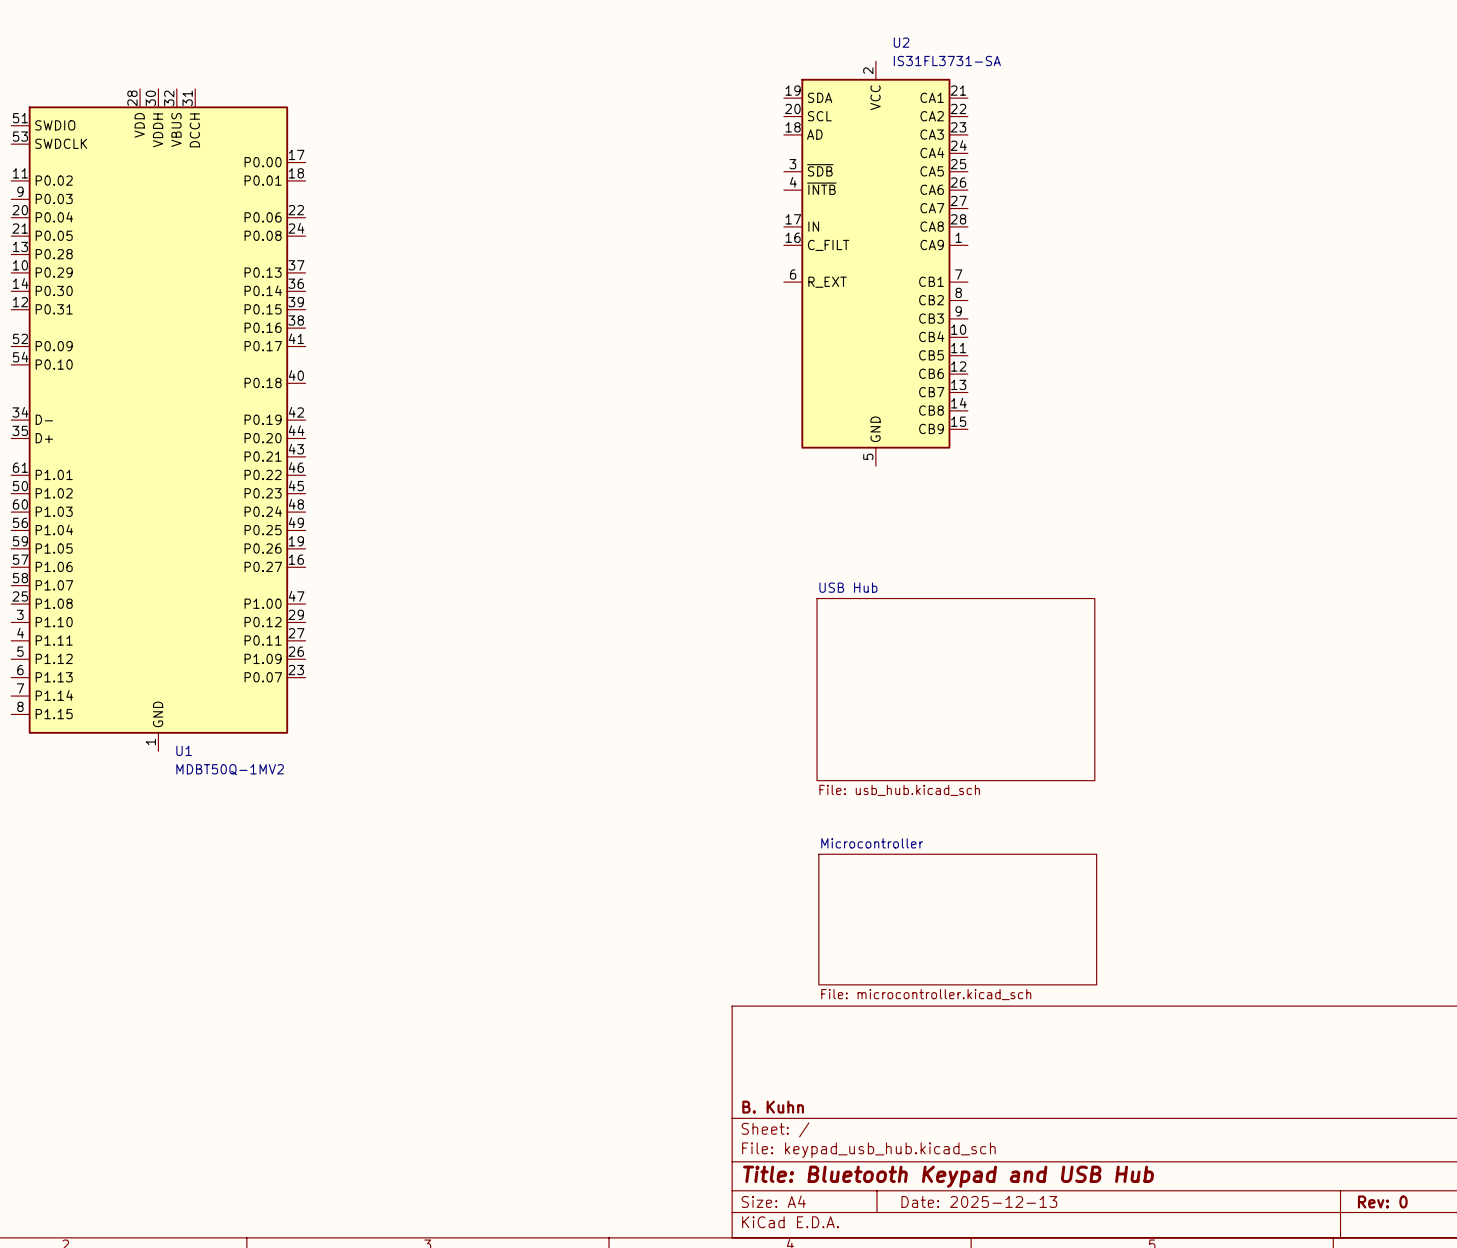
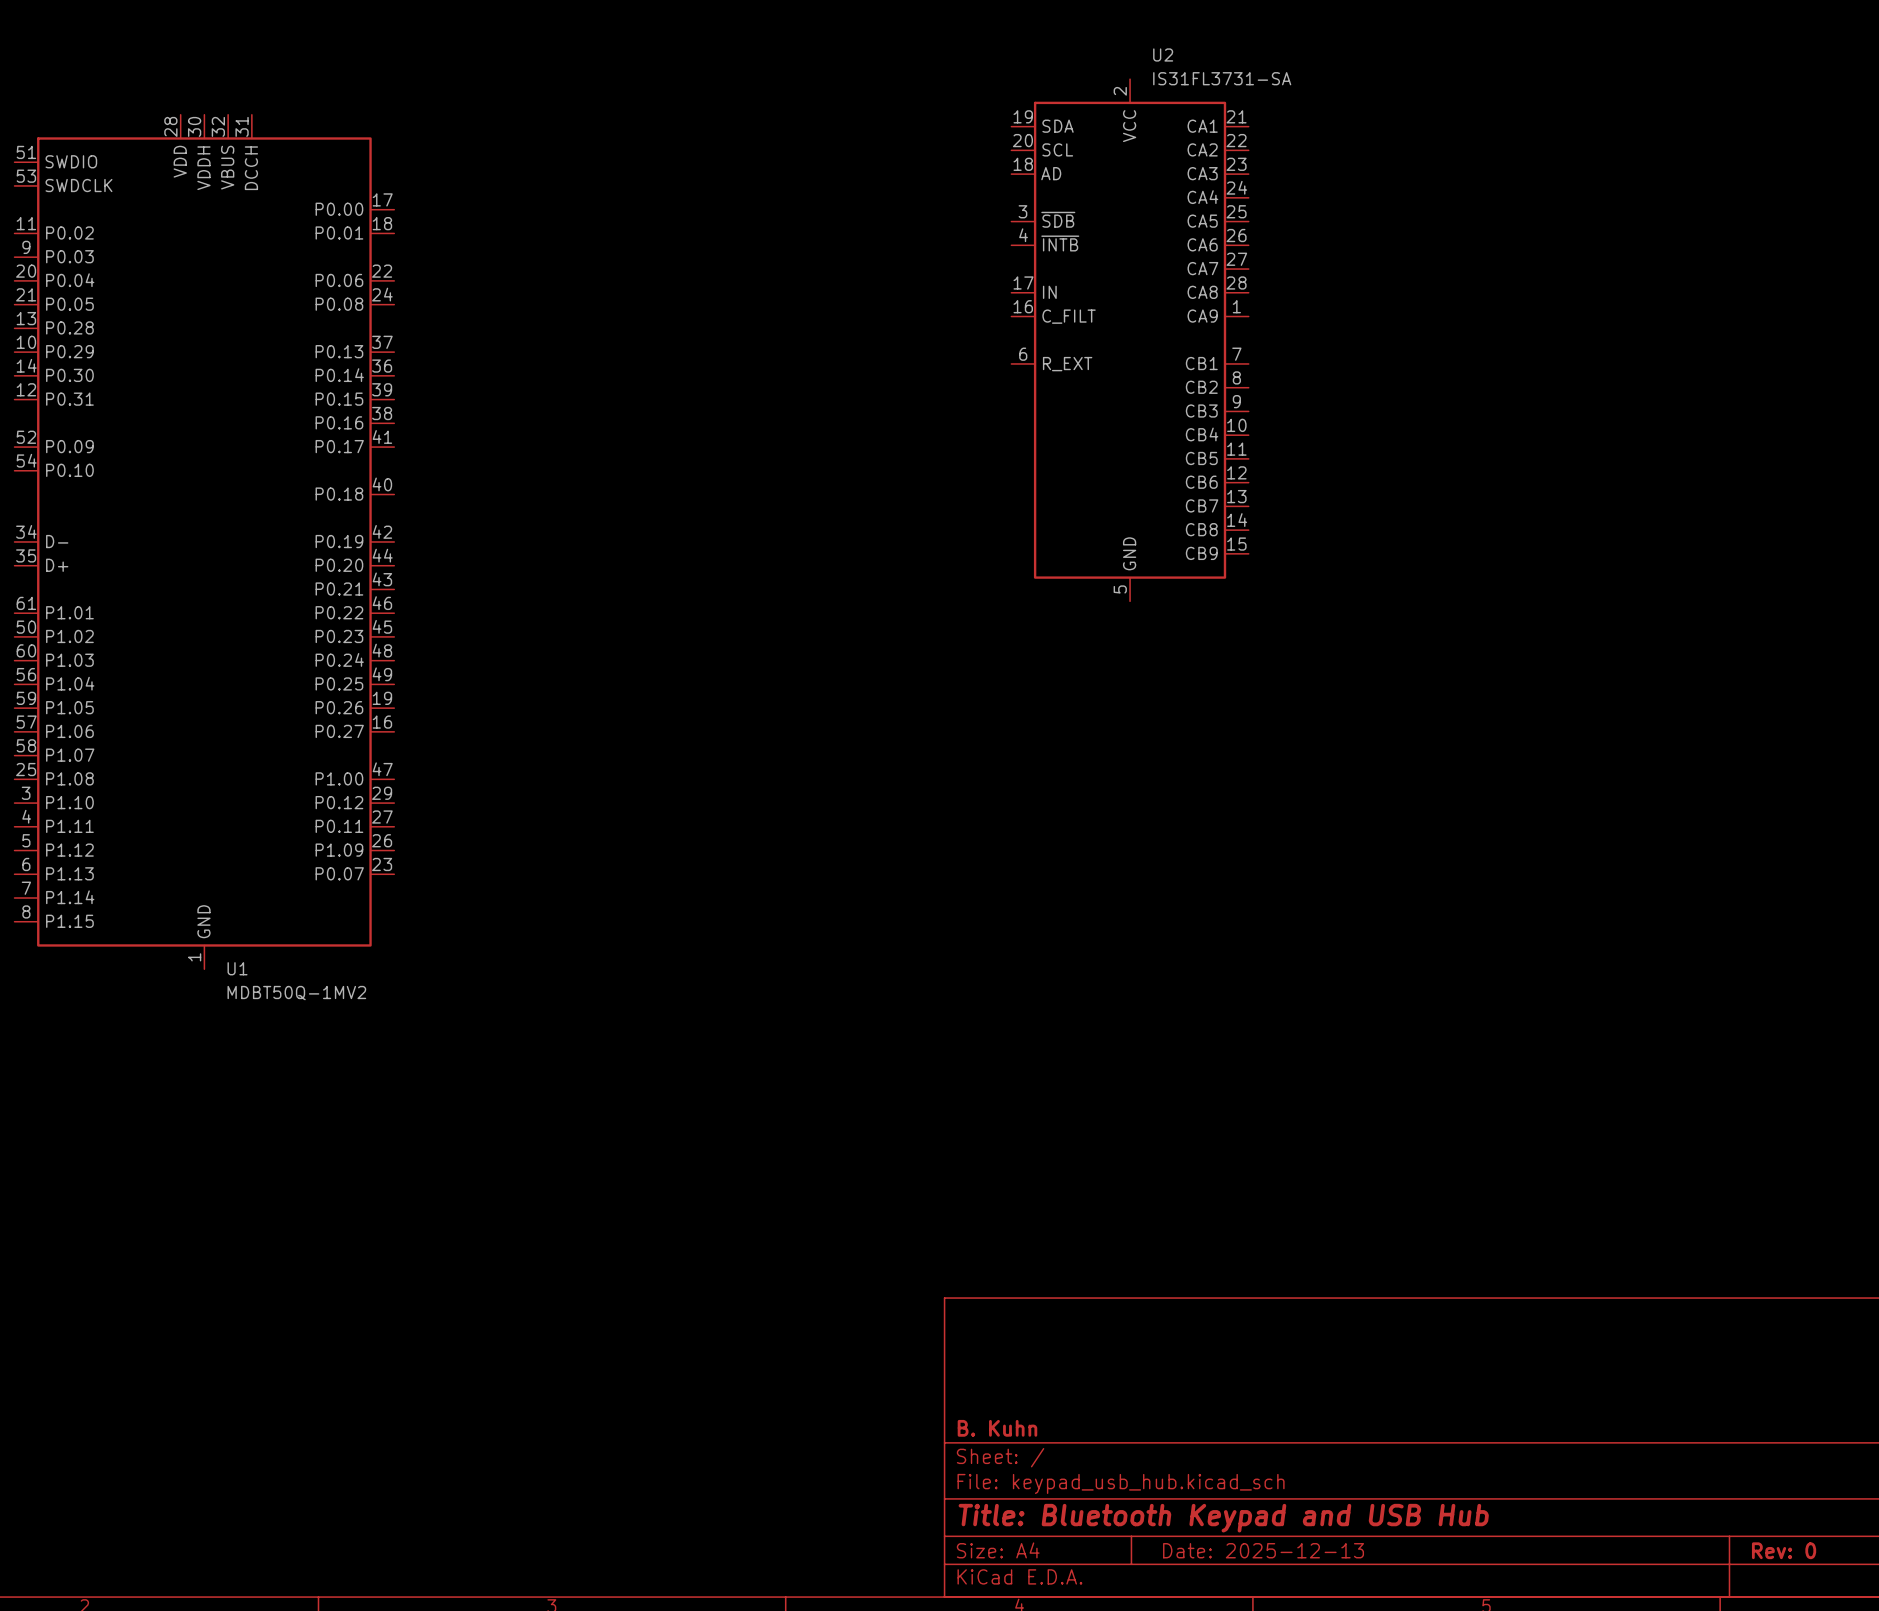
sheet USB Hub: File: usb_hub.kicad_sch (955, 689) -> none
sheet Microcontroller: File: microcontroller.kicad_sch (957, 919) -> none

